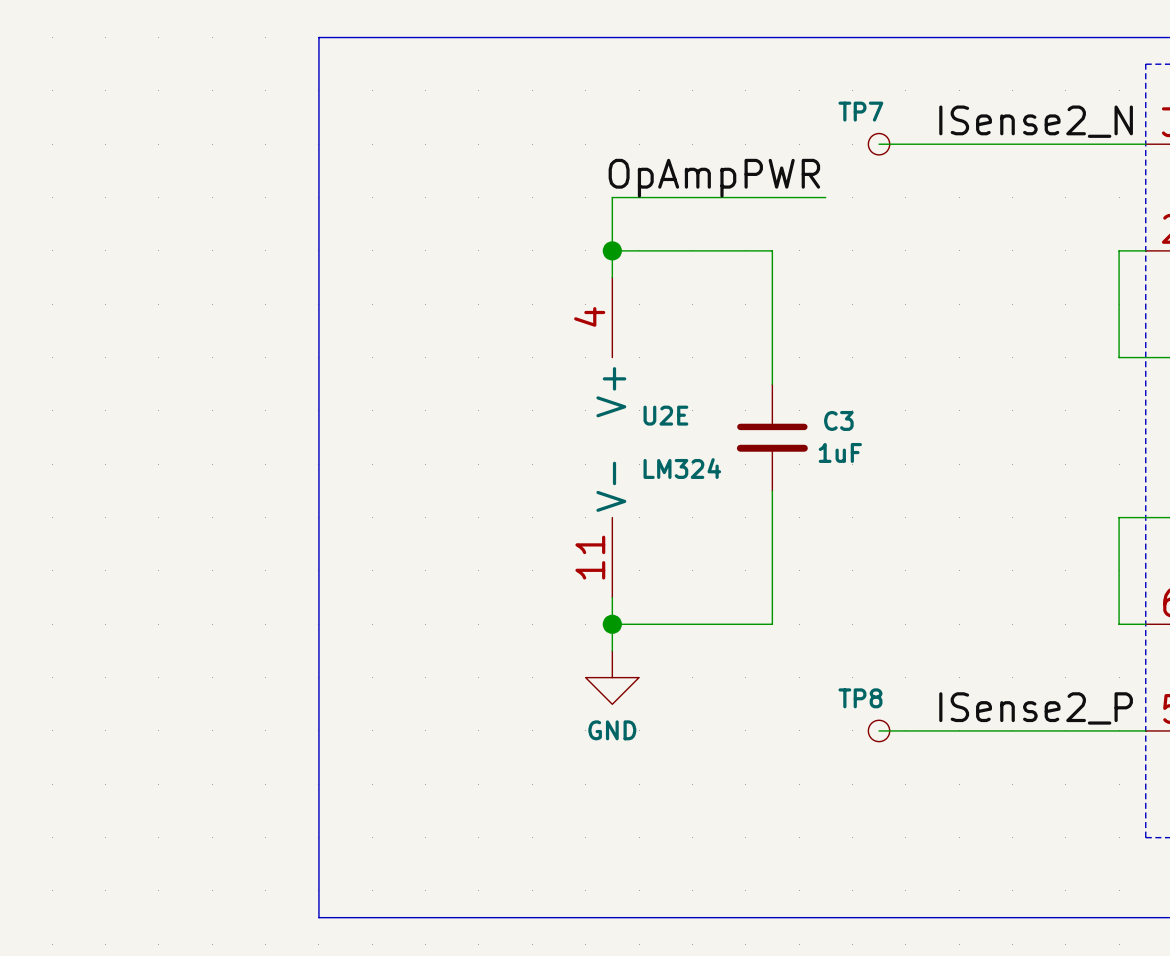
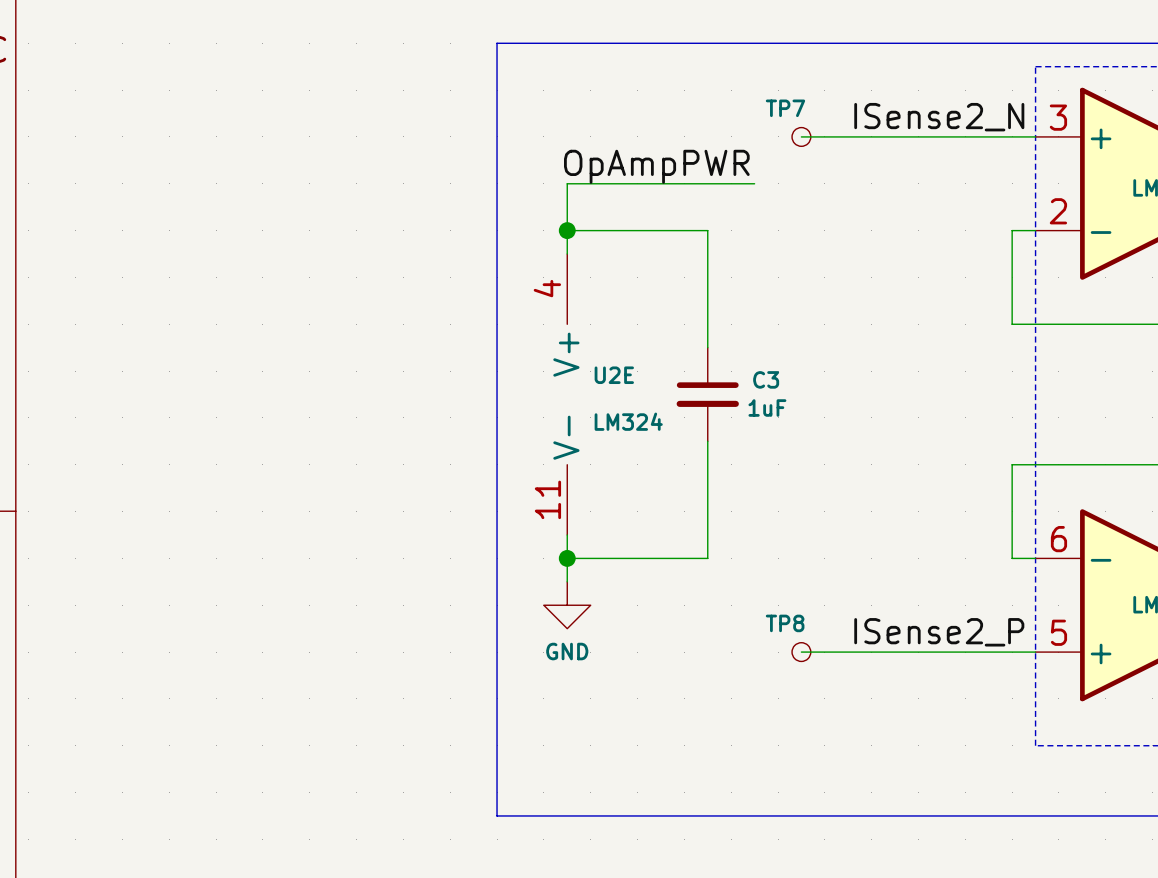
line: (532, 37) (318, 37) (318, 917) (532, 917) -> (497, 43) (497, 815)

